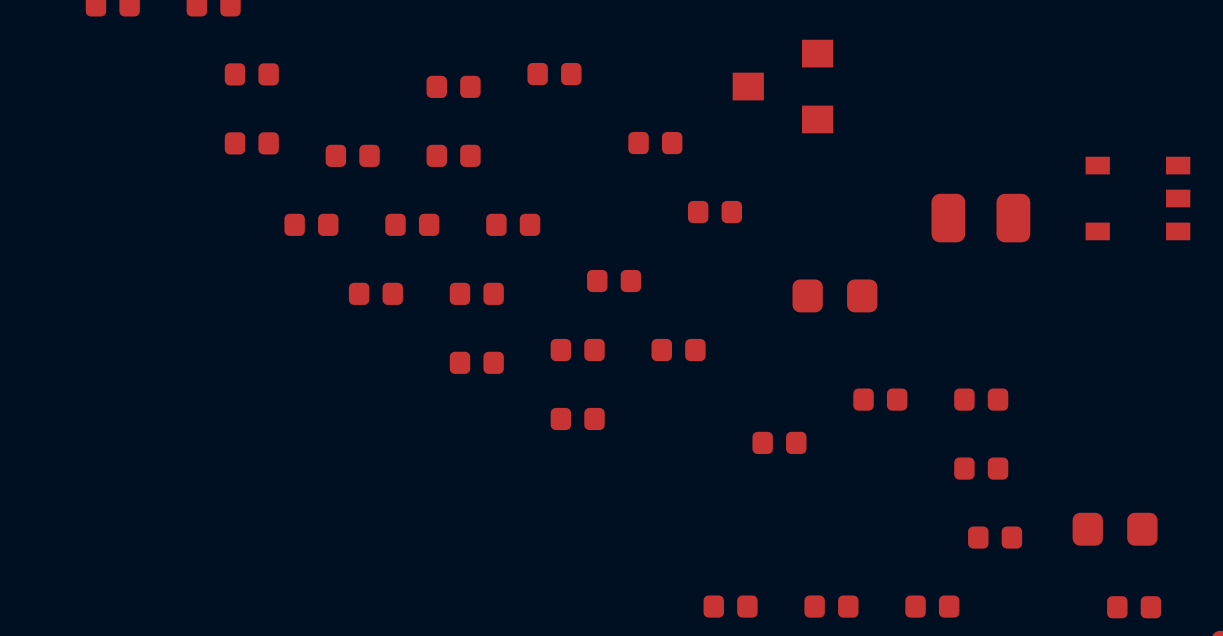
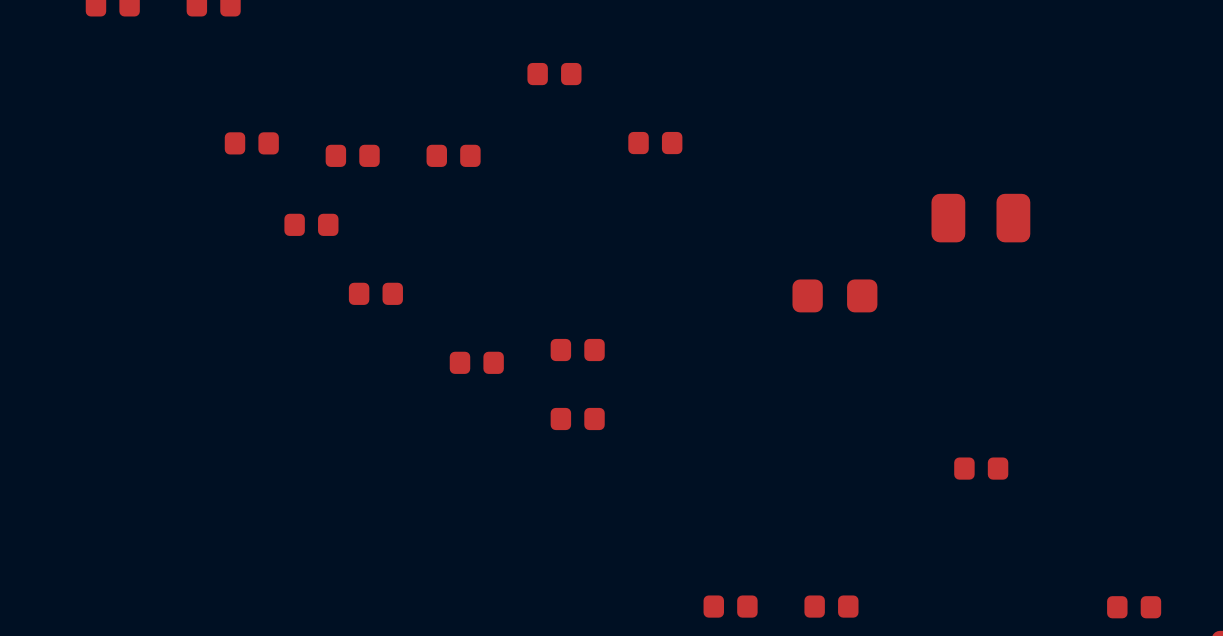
part: (251, 74) -> none
part: (453, 86) -> none
part: (782, 86) -> none
part: (1137, 198) -> none
part: (714, 212) -> none
part: (412, 224) -> none
part: (513, 224) -> none
part: (614, 281) -> none
part: (476, 293) -> none
part: (678, 350) -> none
part: (880, 399) -> none
part: (981, 399) -> none
part: (779, 442) -> none
part: (1115, 529) -> none
part: (995, 537) -> none
part: (932, 606) -> none

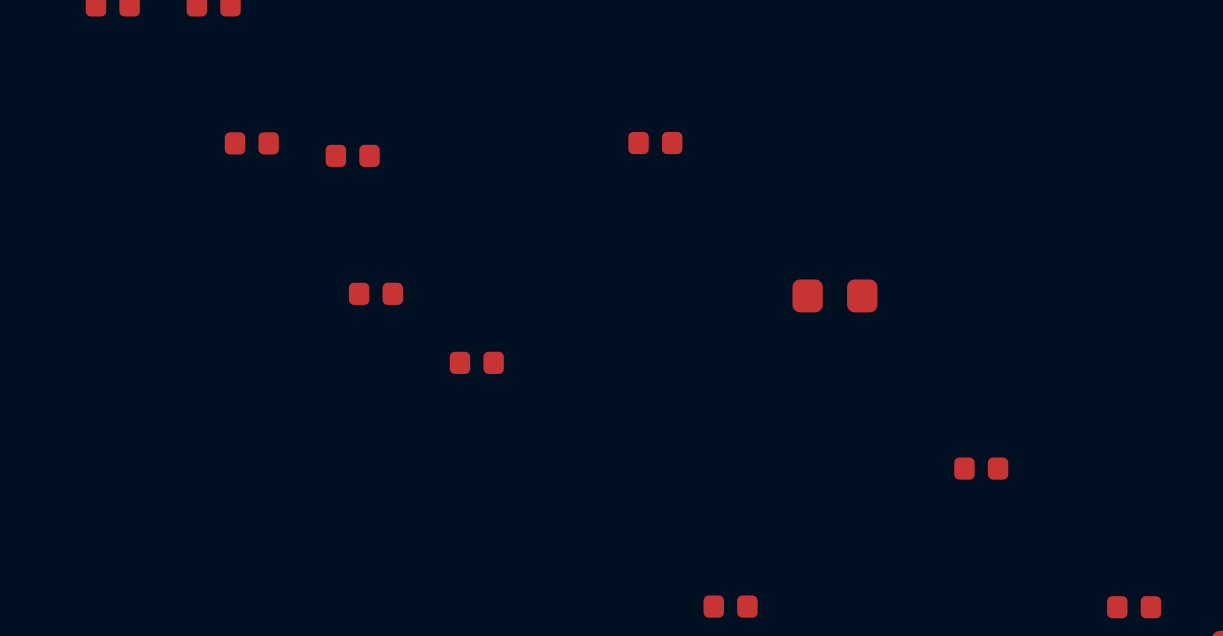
part: (554, 74) -> none
part: (453, 155) -> none
part: (980, 218) -> none
part: (311, 224) -> none
part: (577, 350) -> none
part: (577, 418) -> none
part: (831, 606) -> none

